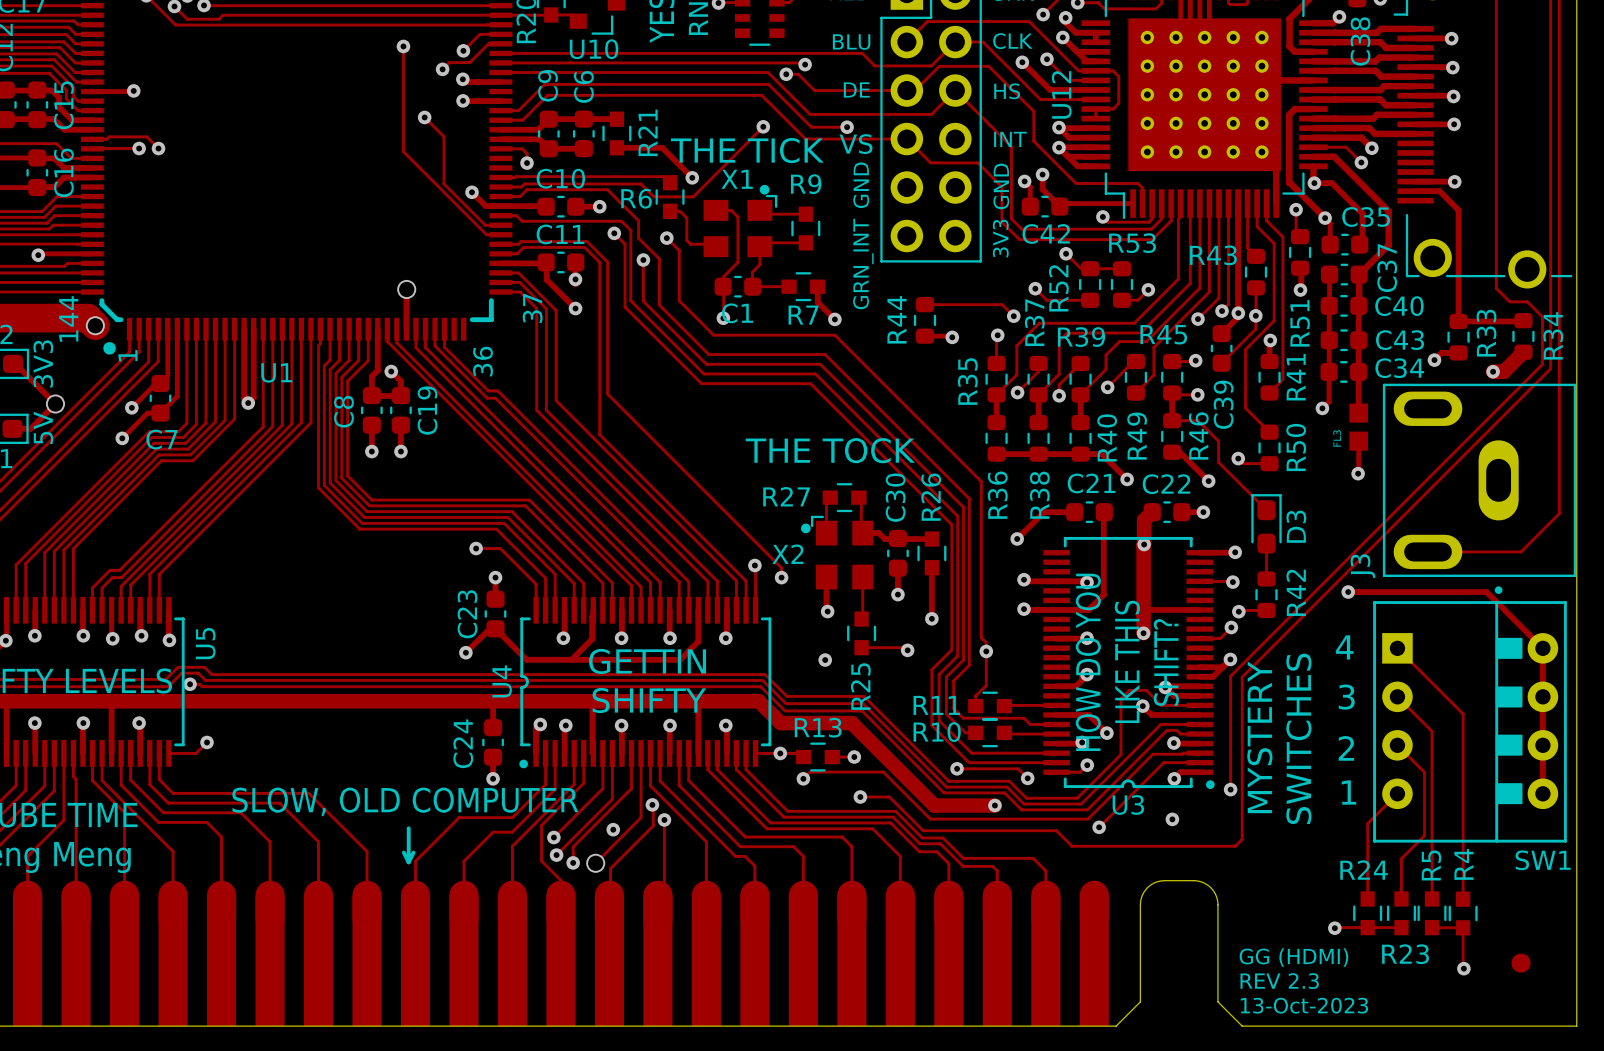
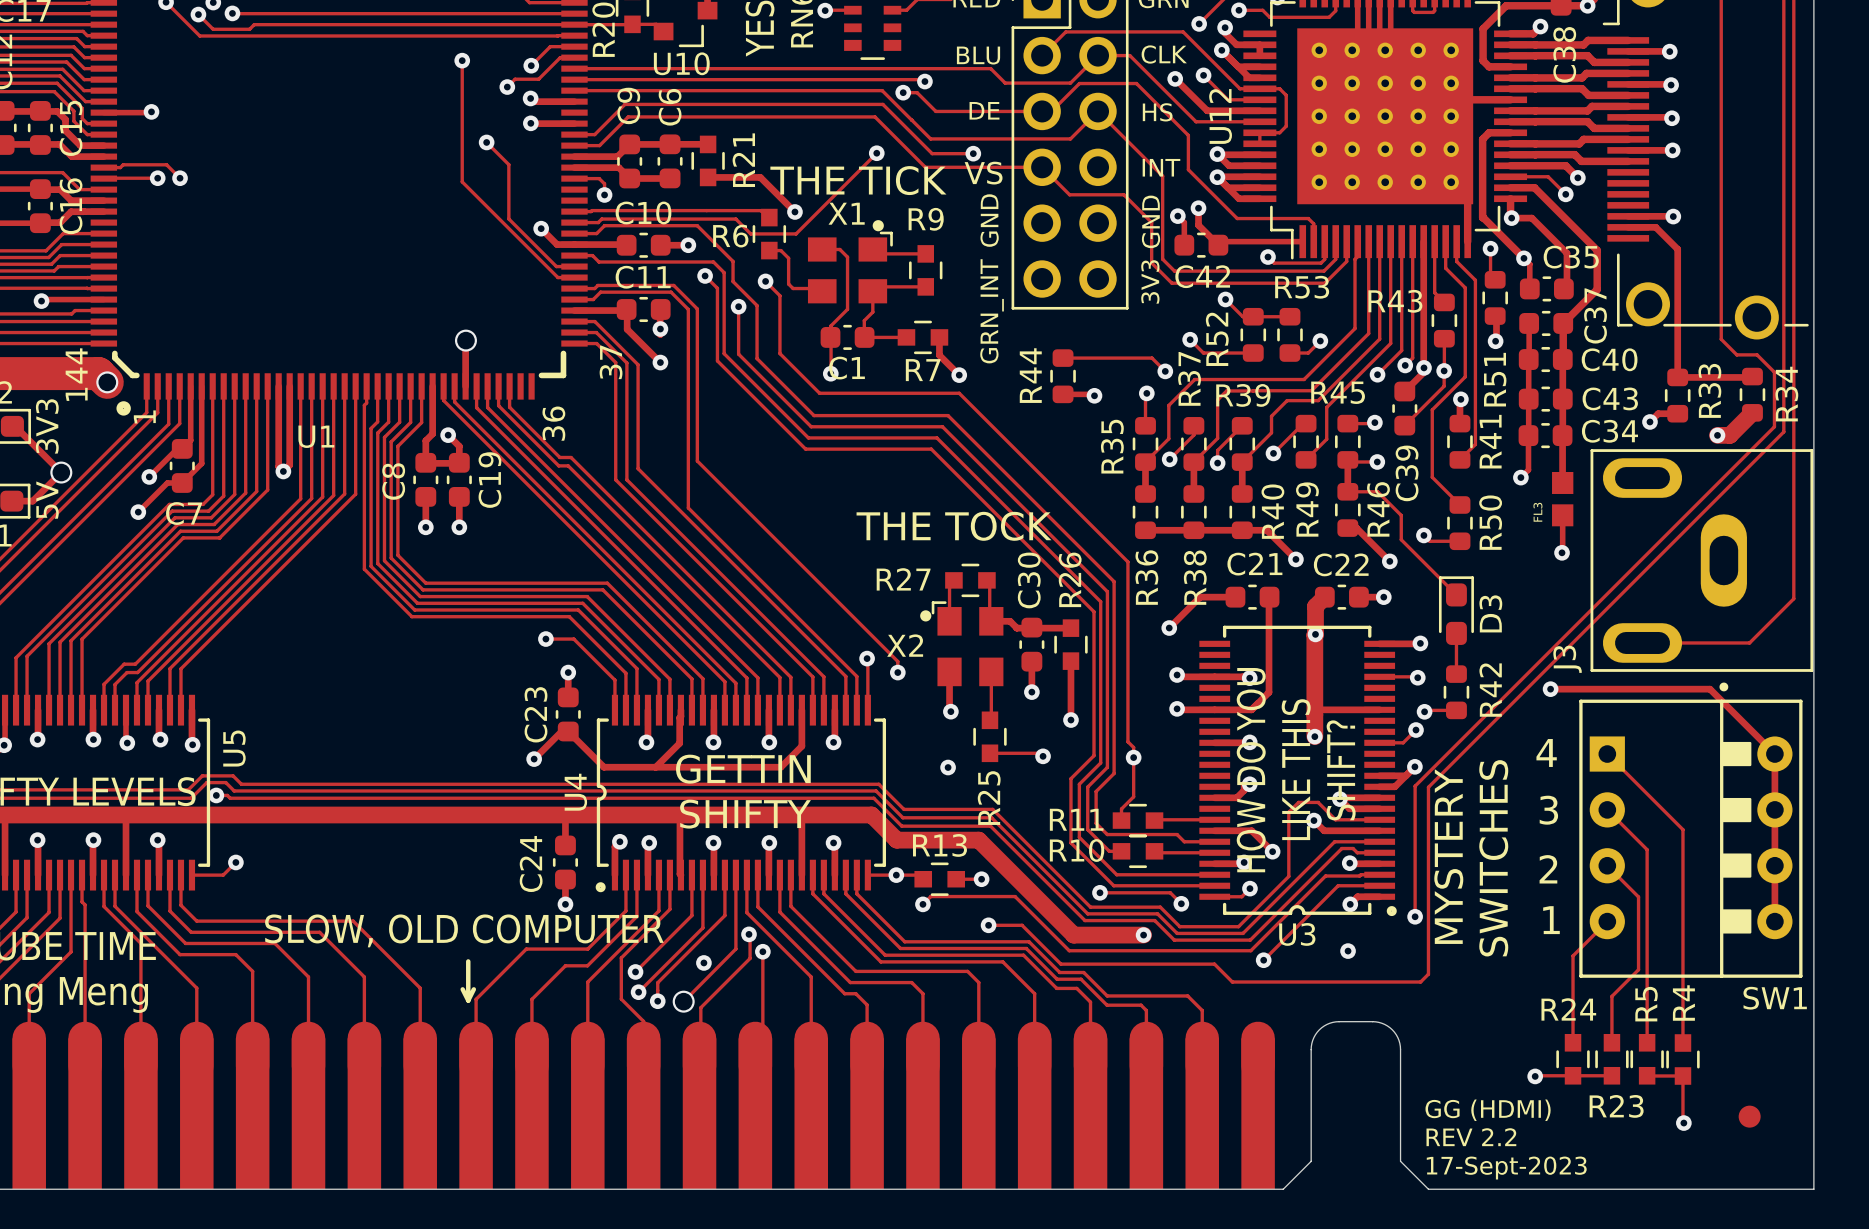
text: REV 2.3 (1279, 981) -> REV 2.2 (1471, 1137)
text: 13-Oct-2023 (1304, 1005) -> 17-Sept-2023 (1506, 1168)

